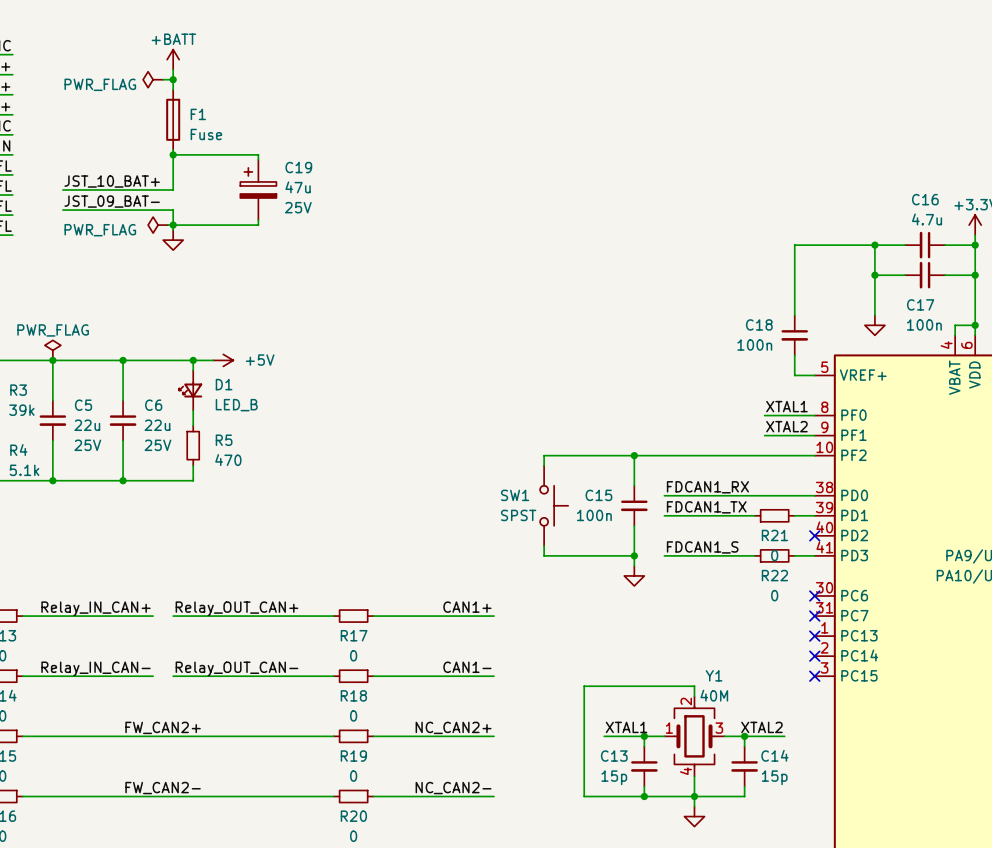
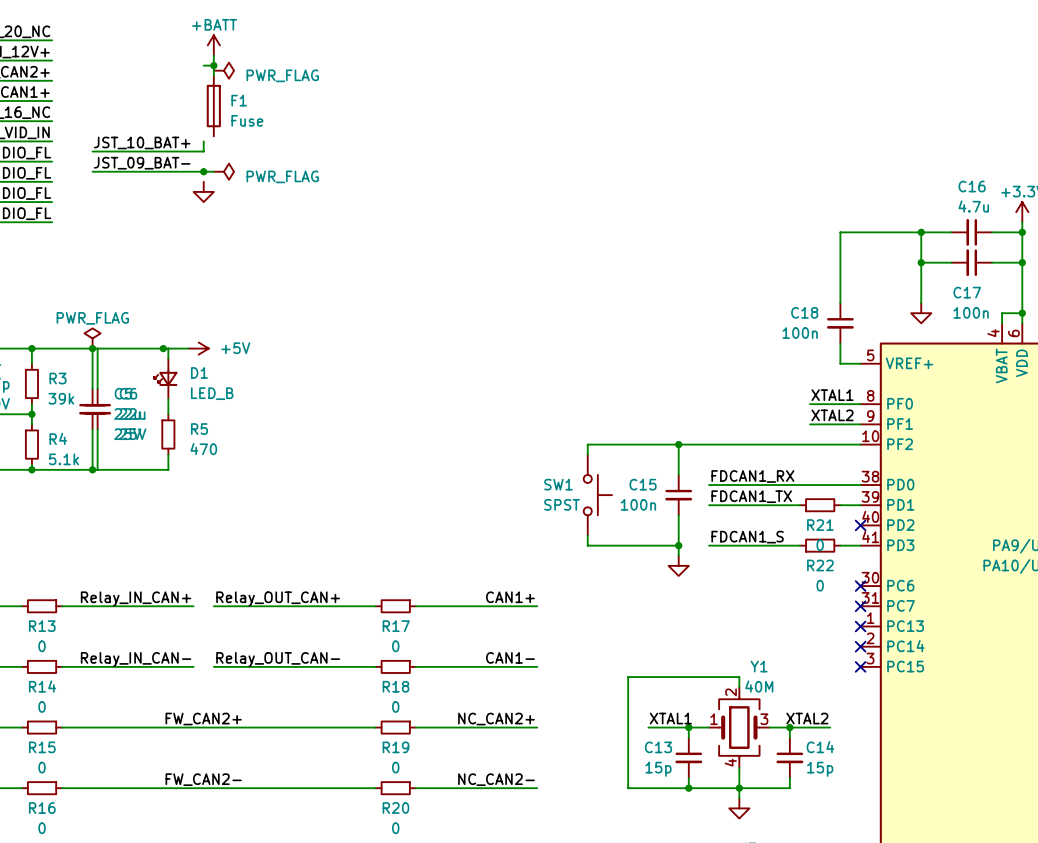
power symbol rotation: 0° (153, 79) -> 180° (223, 70)
power symbol position: PWR_FLAG (153, 79) -> PWR_FLAG (223, 70)
wire: (173, 149) (173, 189) (62, 189) -> none
wire: none -> (203, 141) (203, 151) (92, 151)
wire: (173, 154) (258, 154) (258, 159) -> none
junction: (173, 154) -> none
label position: JST_10_BAT+ (112, 181) -> JST_10_BAT+ (142, 142)
wire: none -> (92, 171) (213, 171)
junction: none -> (203, 171)
C19: 47u (258, 189) -> none
label position: JST_09_BAT- (112, 201) -> JST_09_BAT- (142, 163)
wire: (62, 210) (173, 210) (173, 230) -> none
wire: (258, 220) (258, 225) (168, 225) -> none
power symbol rotation: 0° (158, 225) -> 180° (223, 171)
power symbol position: PWR_FLAG (158, 225) -> PWR_FLAG (223, 171)
junction: (173, 225) -> none
power symbol position: (173, 240) -> (203, 191)
wire: (123, 360) (123, 400) -> (97, 348) (97, 389)
wire: (148, 360) (213, 360) -> none
wire: (193, 360) (193, 370) -> (168, 348) (168, 358)
junction: (193, 360) -> none
power symbol position: +5V (223, 360) -> +5V (198, 348)
D1 position: (190, 390) -> (165, 378)
wire: (193, 410) (193, 425) -> (168, 399) (168, 414)
C6 position: (123, 420) -> (97, 409)
wire: (123, 440) (123, 480) -> (97, 429) (97, 469)
R5 position: (193, 445) -> (168, 434)
wire: (193, 465) (193, 480) (128, 480) -> (168, 454) (168, 469)
junction: (123, 480) -> none

